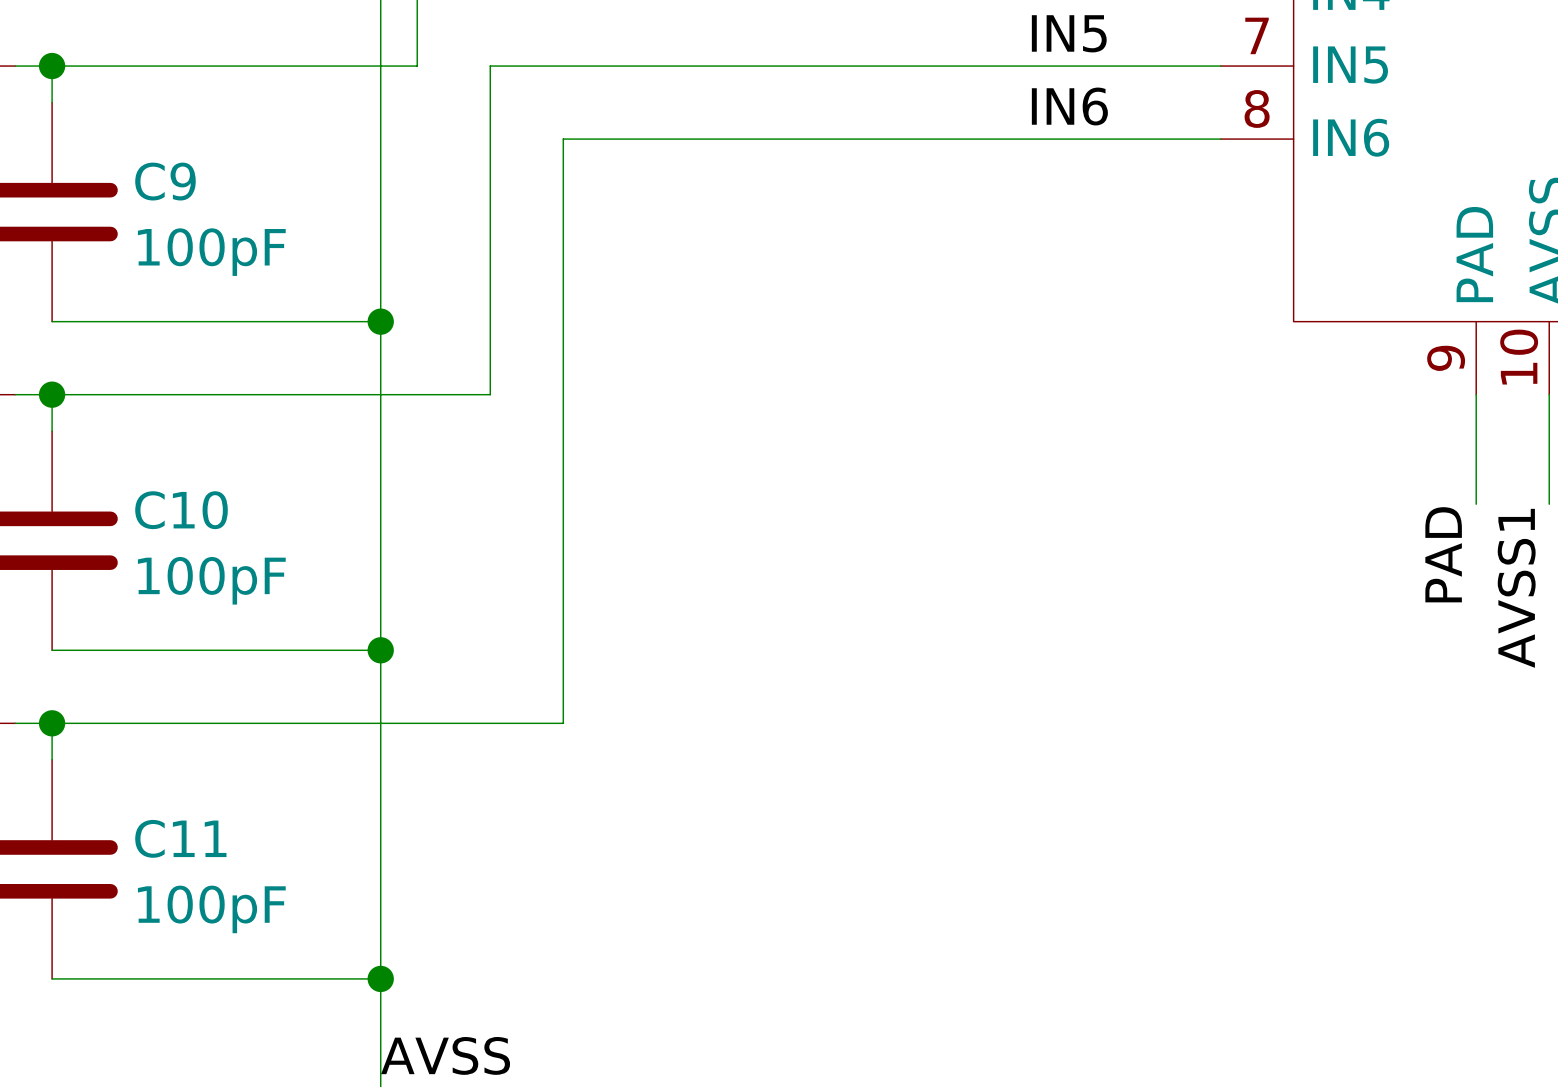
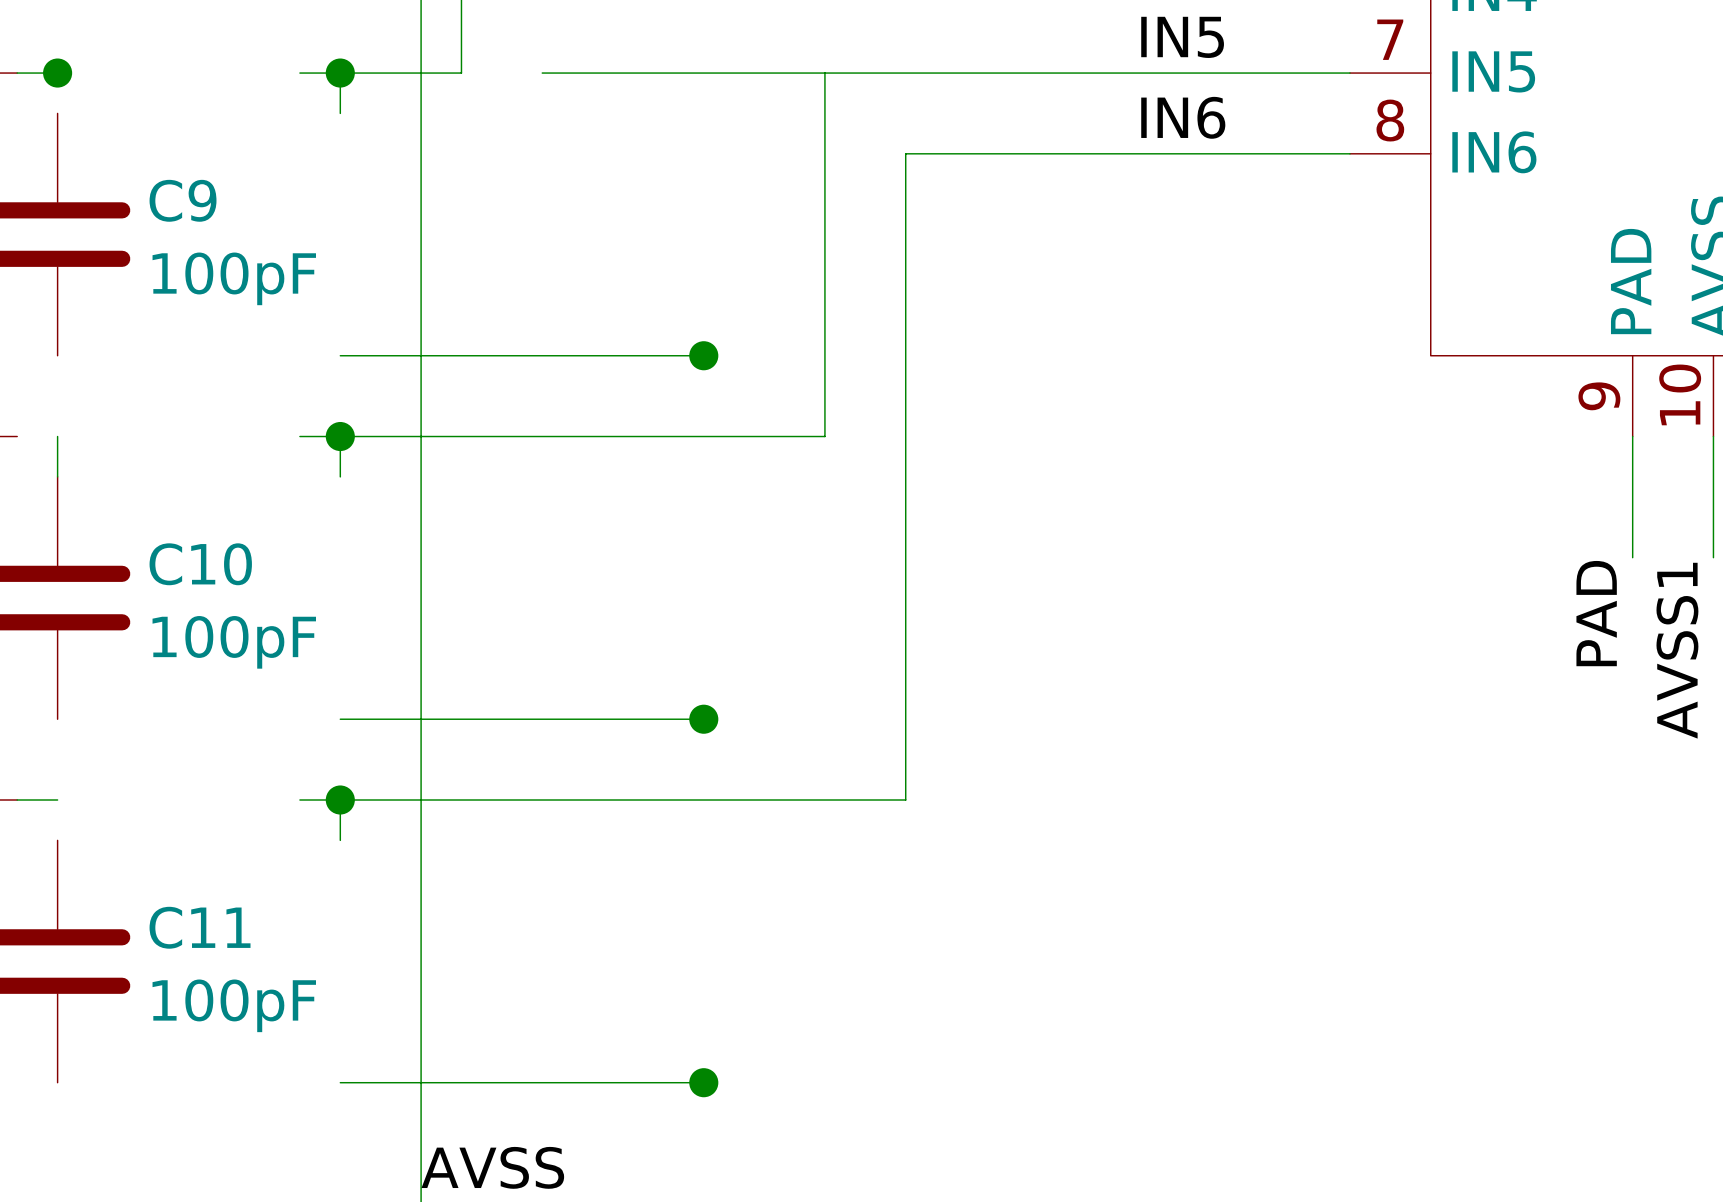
wire: (271, 66) (52, 66) (52, 102) -> none
wire: none -> (340, 73) (340, 113)
junction: none -> (340, 73)
wire: (490, 66) (490, 394) -> (824, 73) (824, 436) (542, 436)
wire: (818, 139) (563, 139) (563, 723) -> (905, 153) (905, 800) (623, 800)
wire: (52, 321) (307, 321) -> (421, 355) (703, 355)
junction position: (380, 321) -> (340, 436)
junction: none -> (703, 355)
wire: (15, 394) (271, 394) -> none
junction: (52, 394) -> none
wire: none -> (340, 436) (340, 476)
wire: (52, 650) (307, 650) -> (421, 719) (703, 719)
junction position: (380, 650) -> (340, 800)
junction: none -> (703, 719)
junction: (52, 723) -> none
wire: (271, 723) (52, 723) (52, 759) -> none
wire: none -> (340, 800) (340, 840)
wire: (52, 978) (307, 978) -> (421, 1082) (703, 1082)
junction: (380, 978) -> none
junction: none -> (703, 1082)

